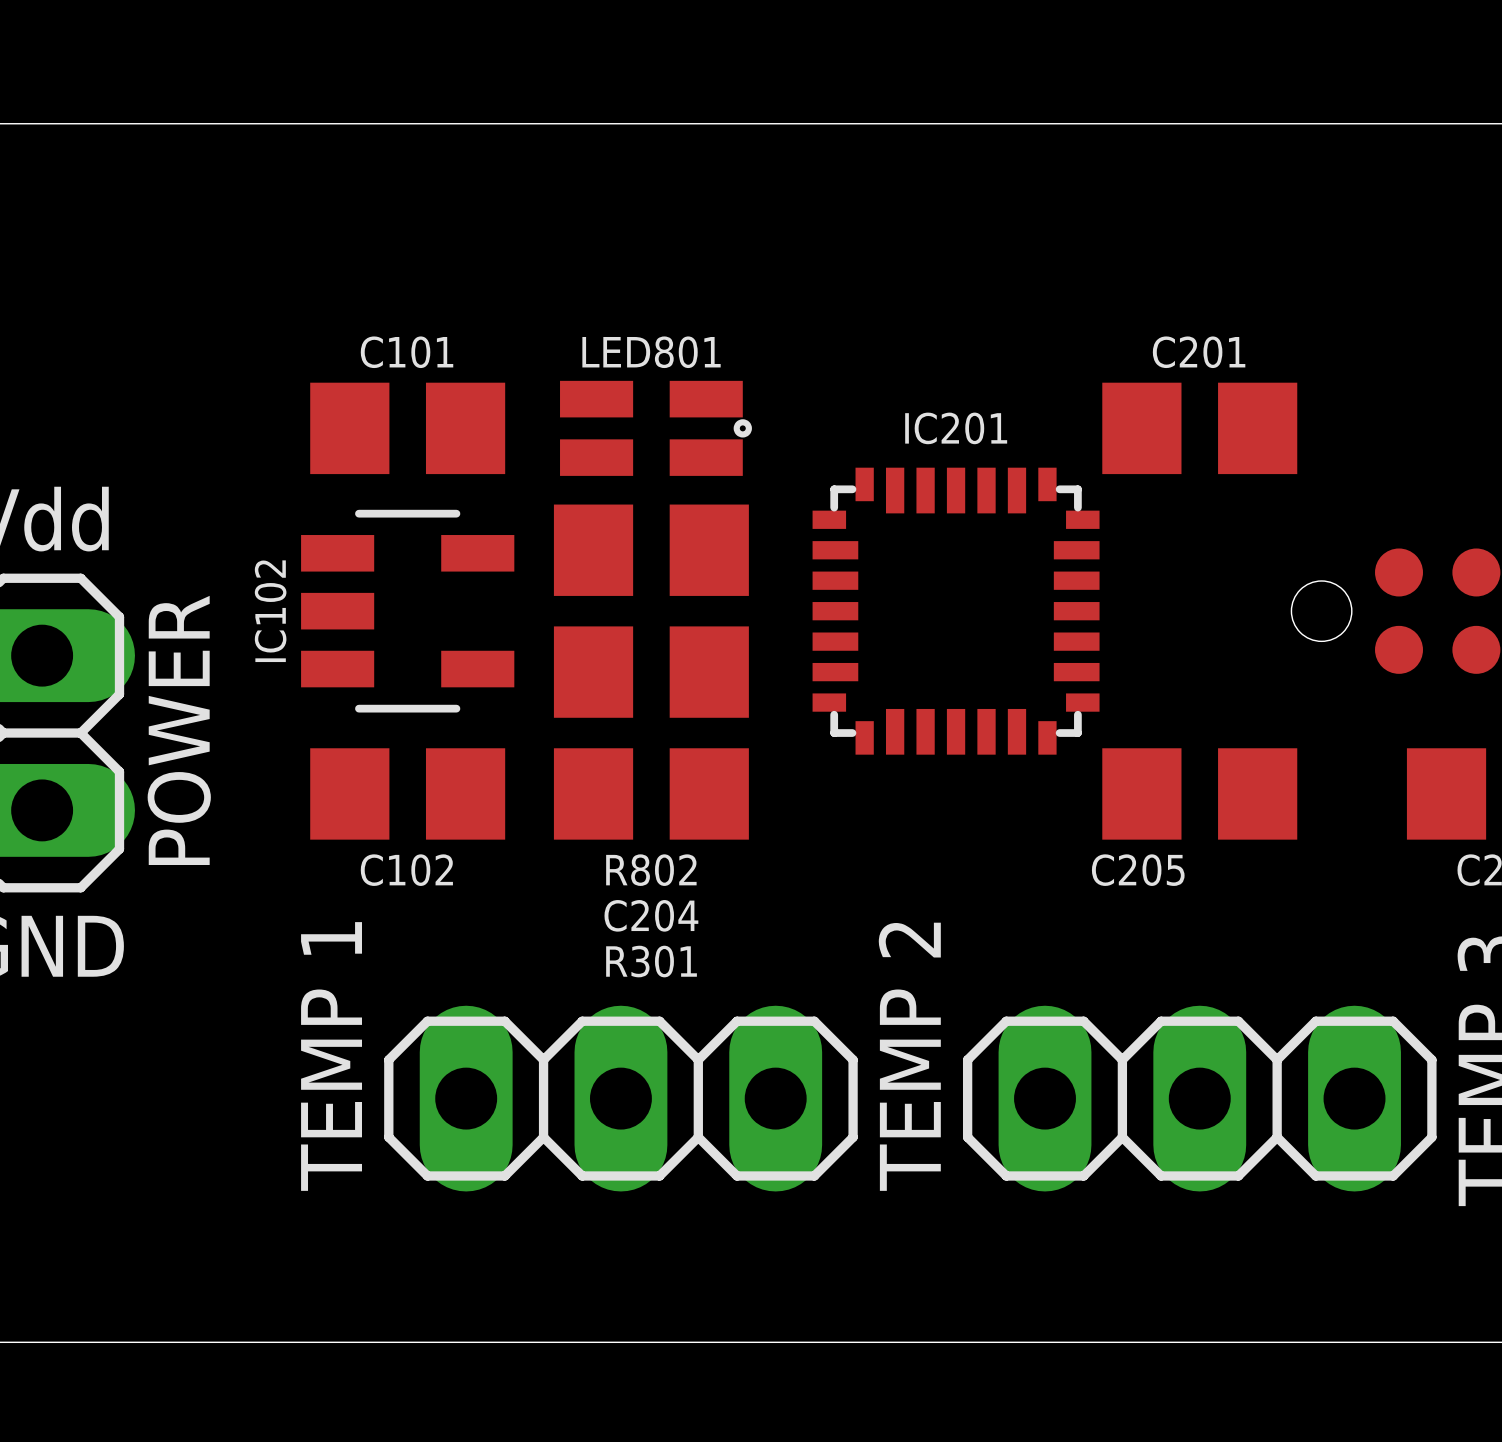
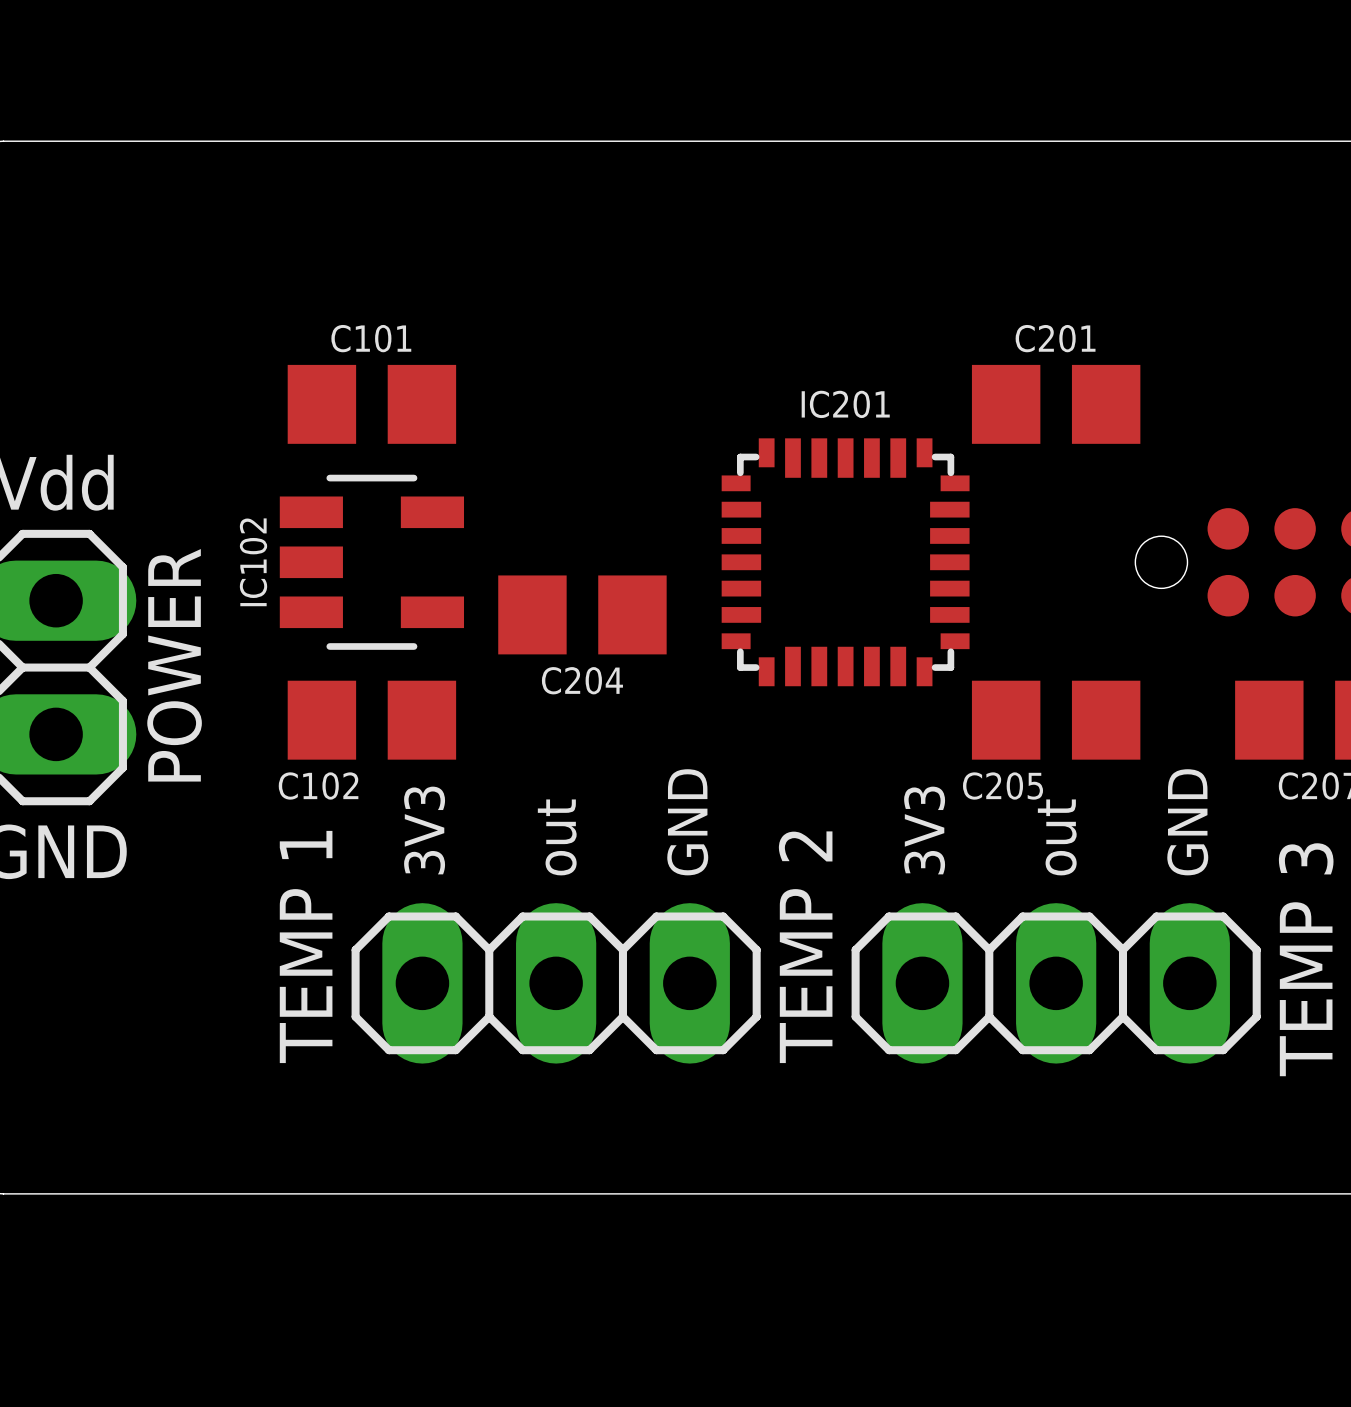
LED801: (655, 428) -> none
R802: (651, 550) -> none
R301: (651, 793) -> none
C102 name position: C102 (406, 870) -> C102 (318, 786)
text: none -> GND (687, 822)
text: none -> GND (1187, 822)
C204 name position: C204 (651, 915) -> C204 (582, 680)
text: none -> 3V3 (424, 830)
text: none -> 3V3 (924, 830)
text: none -> out (557, 837)
text: none -> out (1057, 837)

